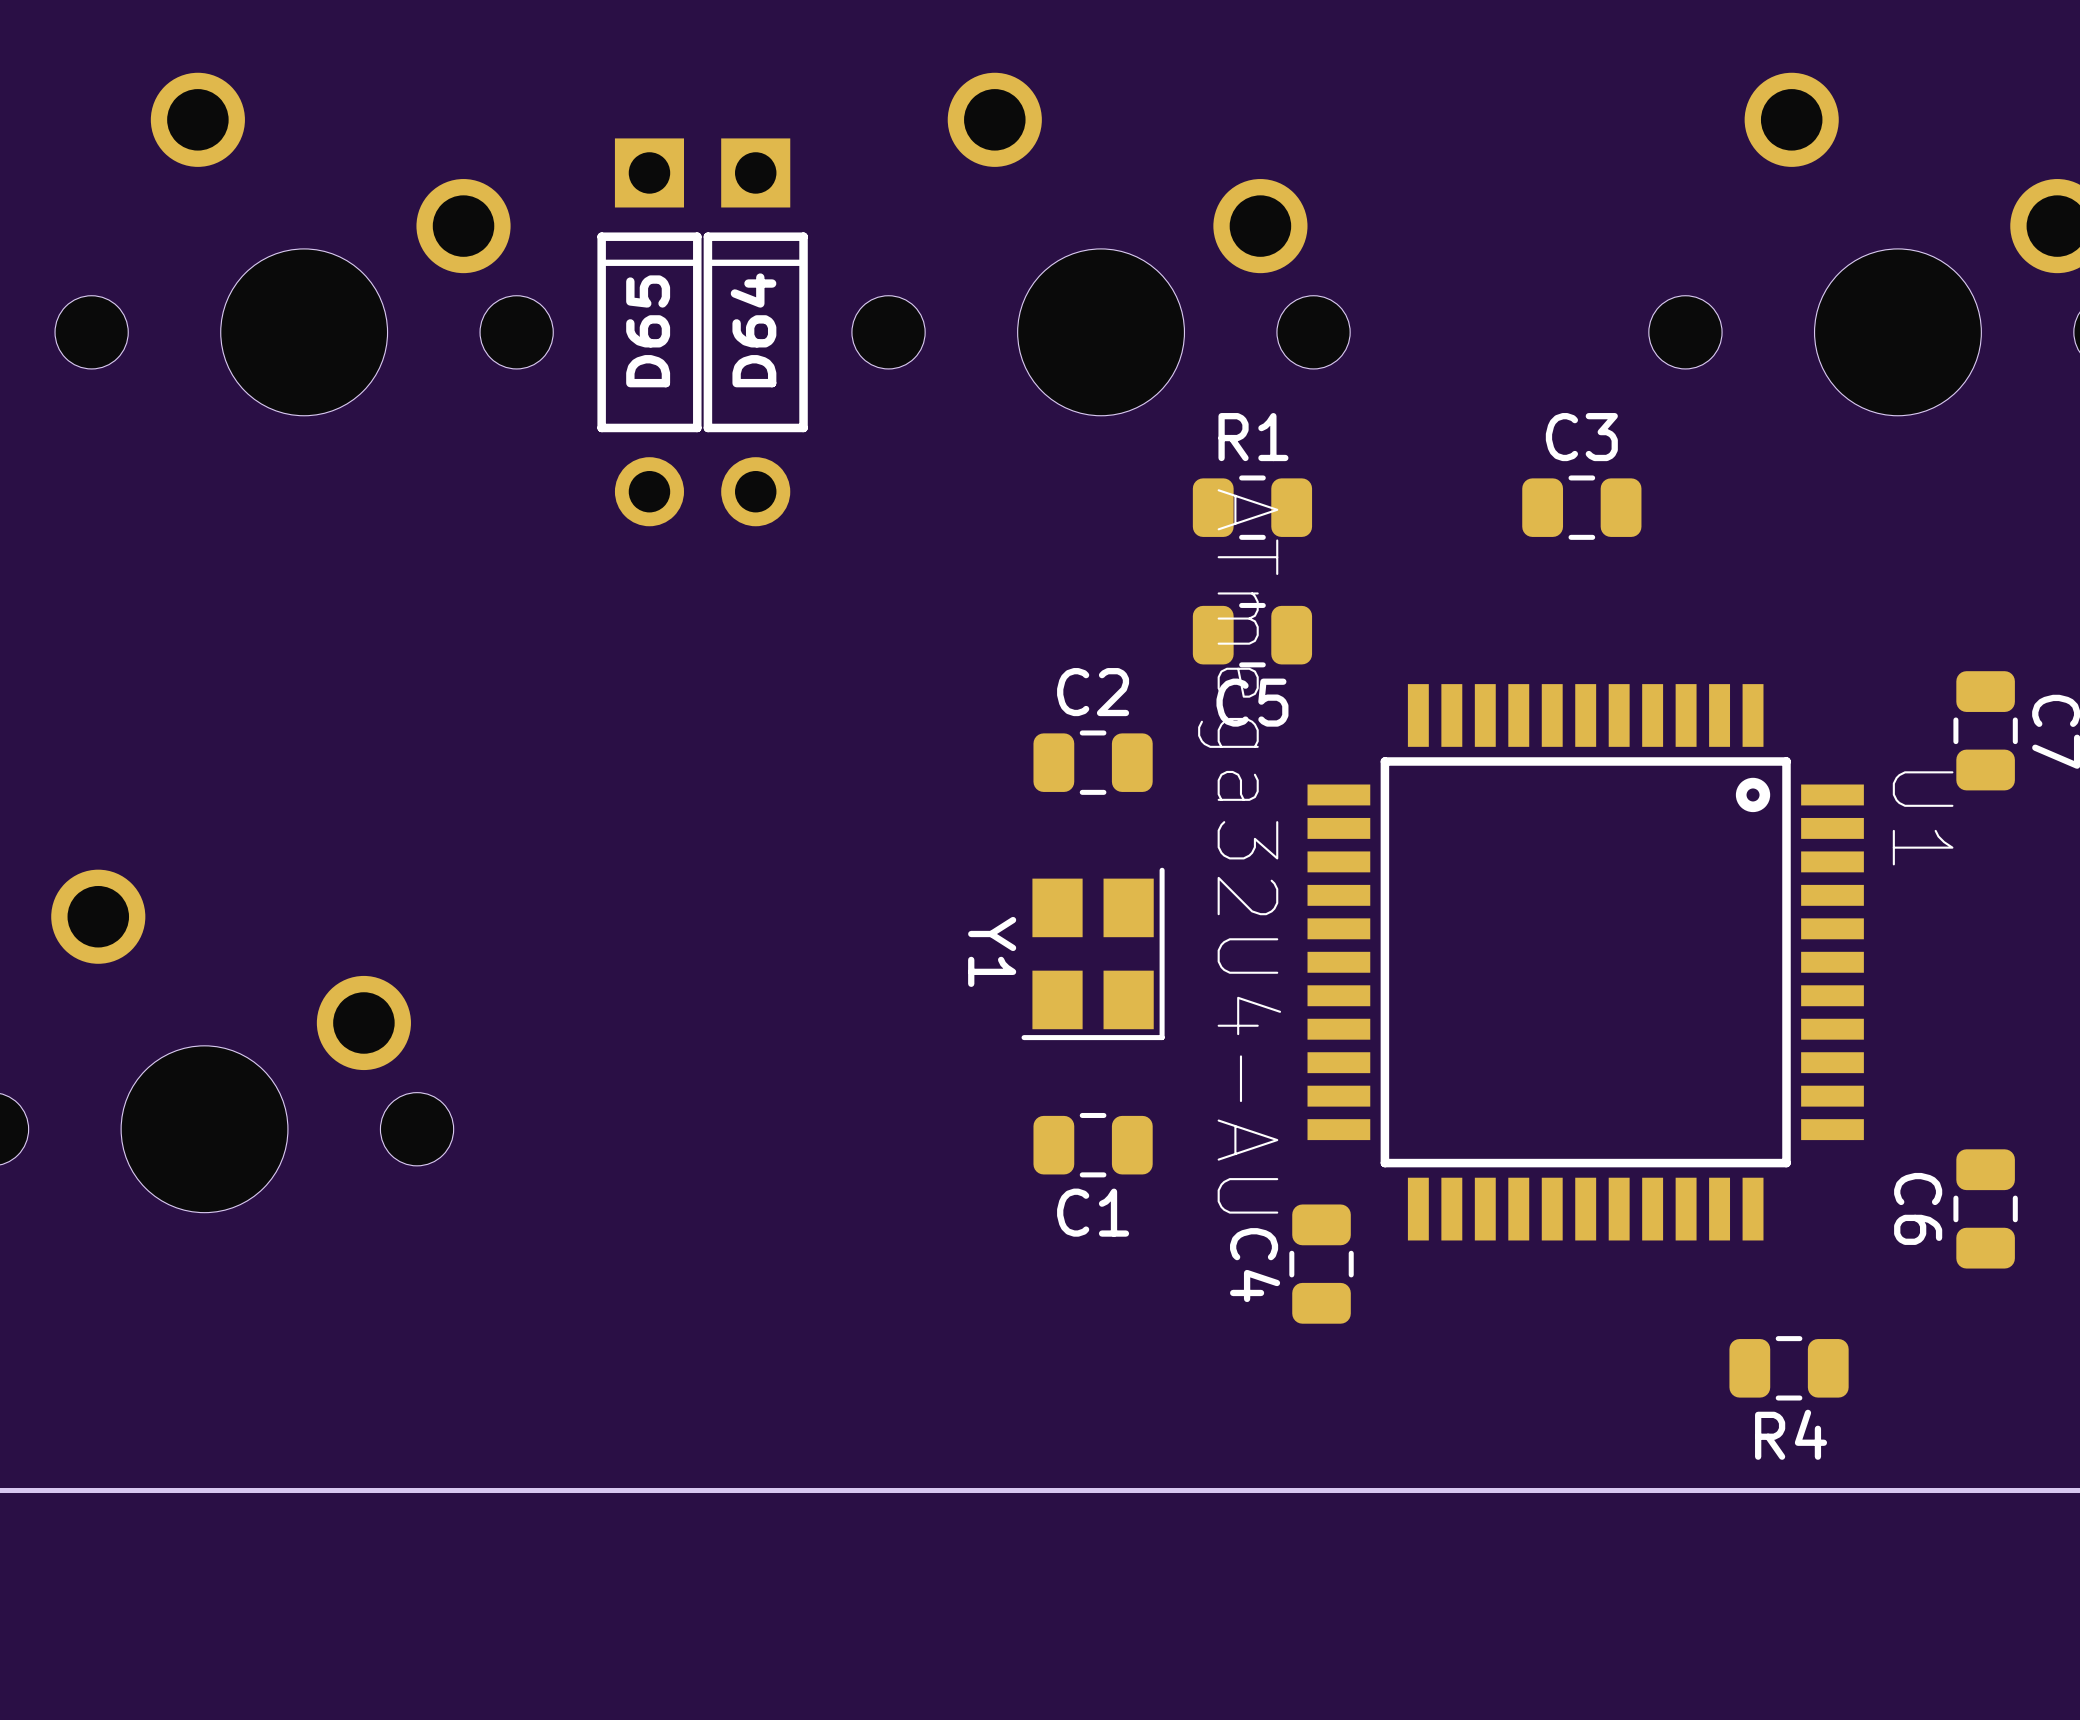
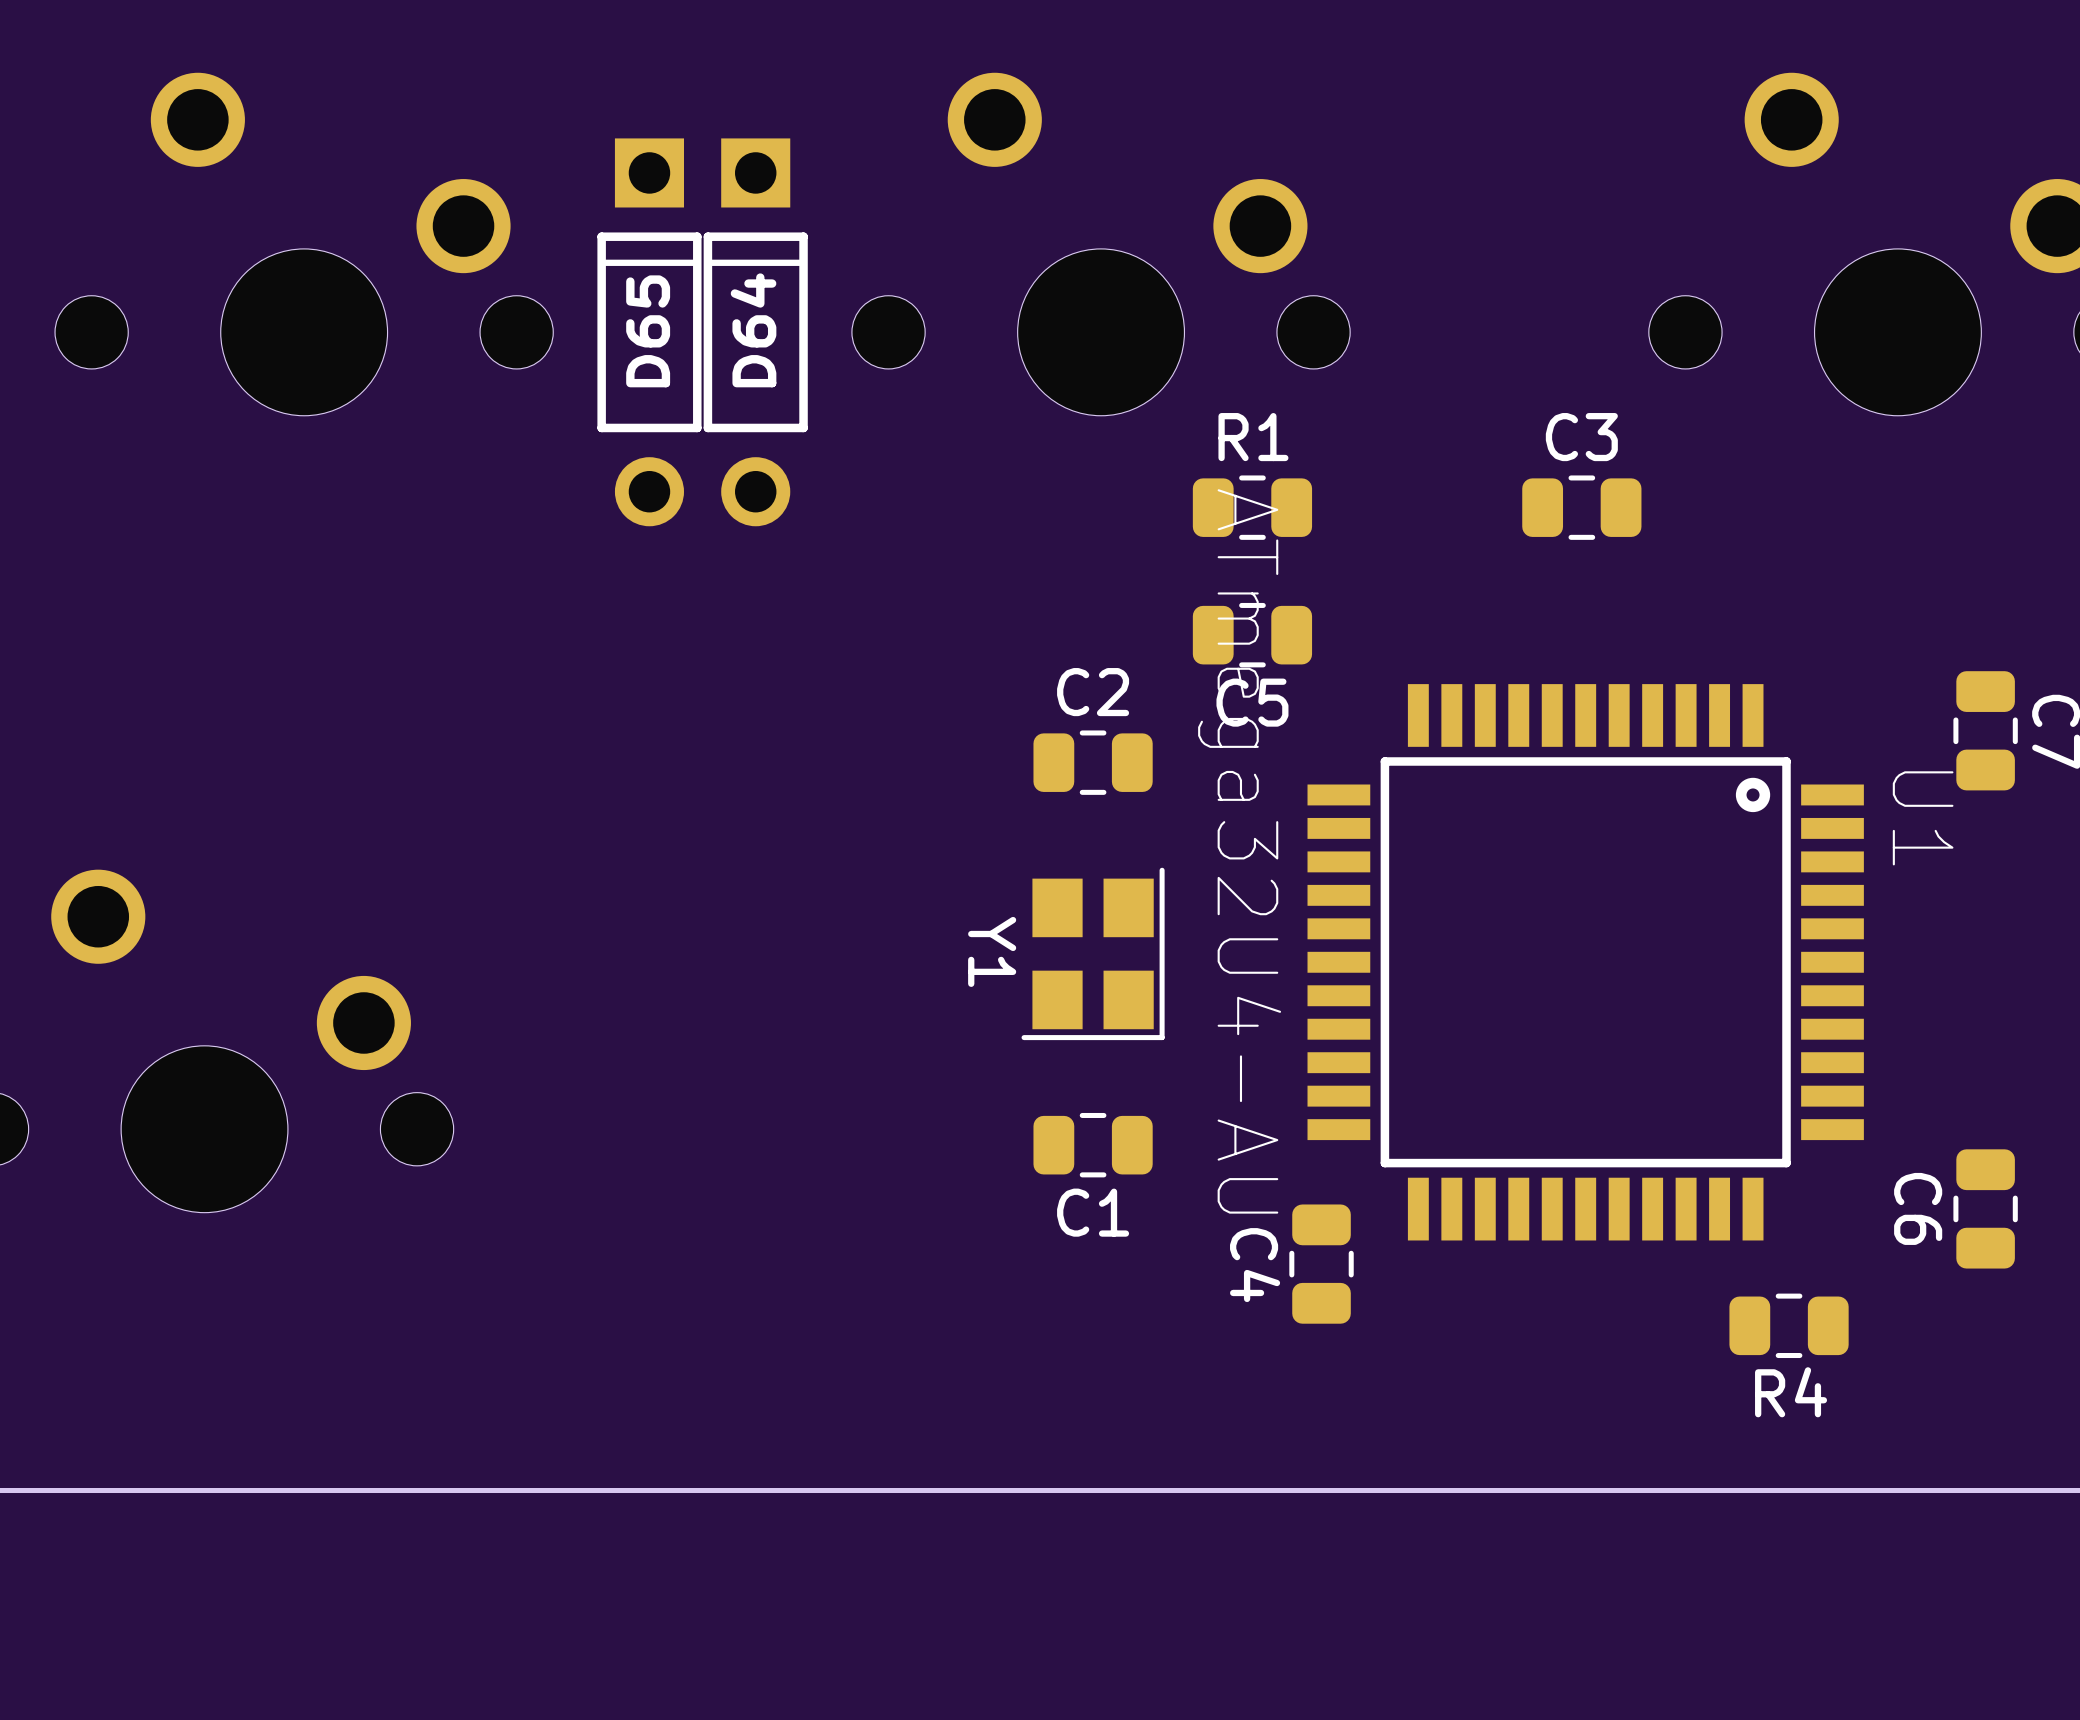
R4 position: (1789, 1368) -> (1789, 1325)

